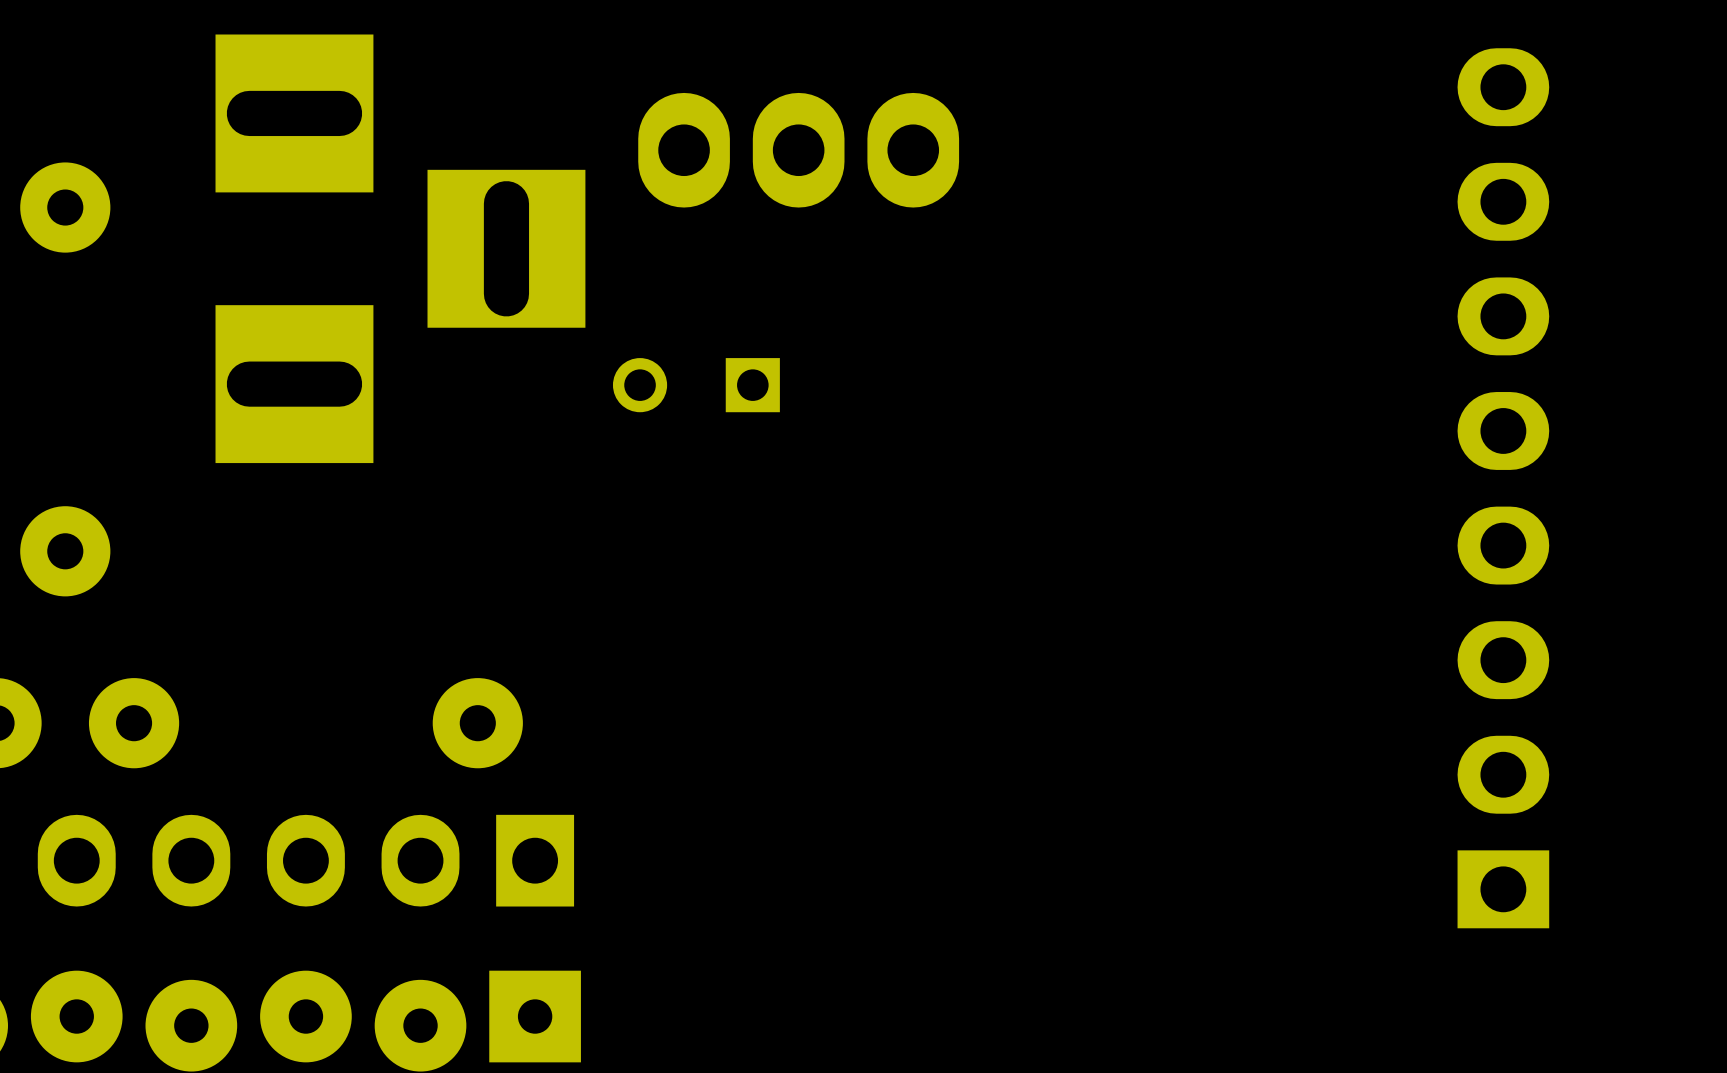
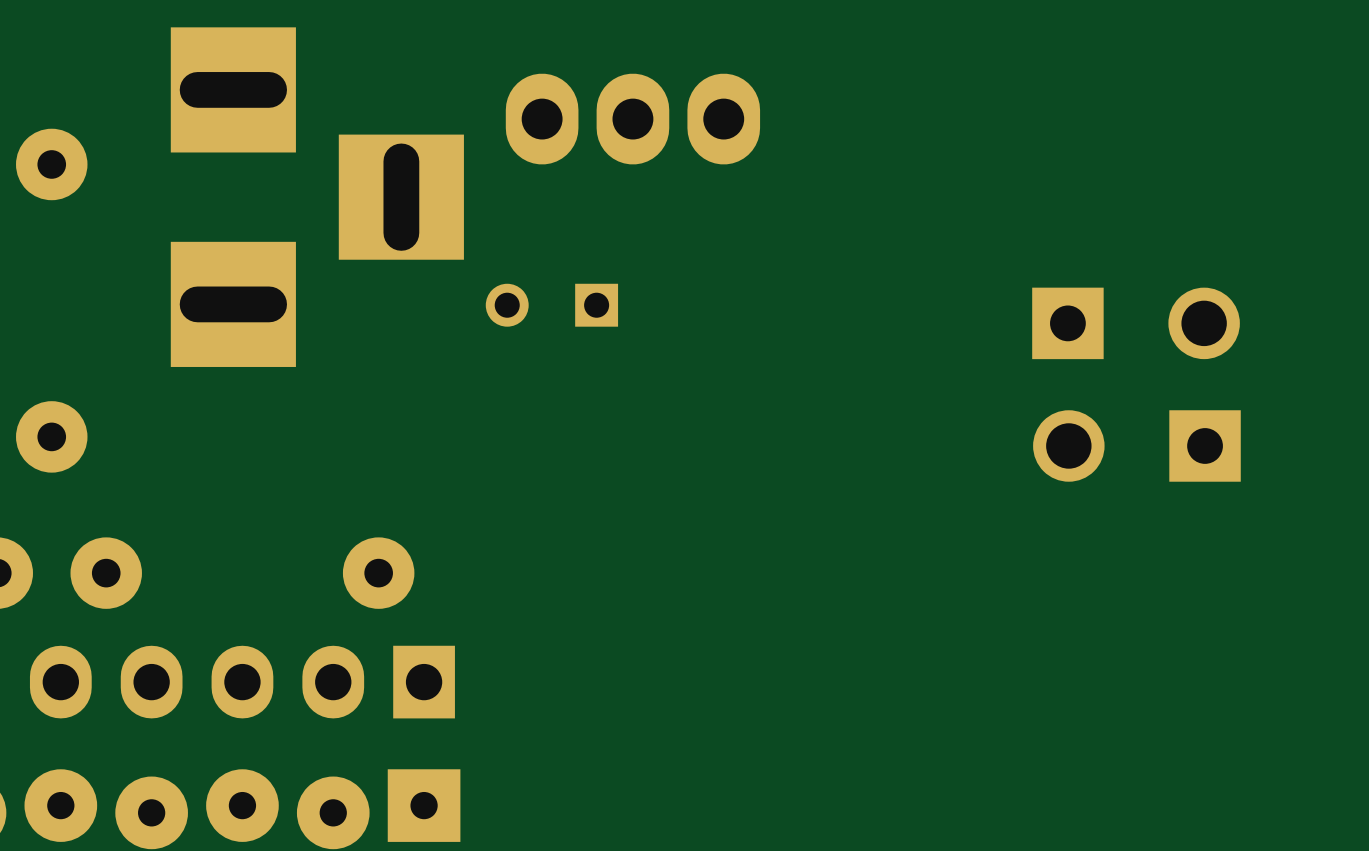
part: none -> (1136, 323)
part: (1503, 488) -> none
part: none -> (1136, 445)

